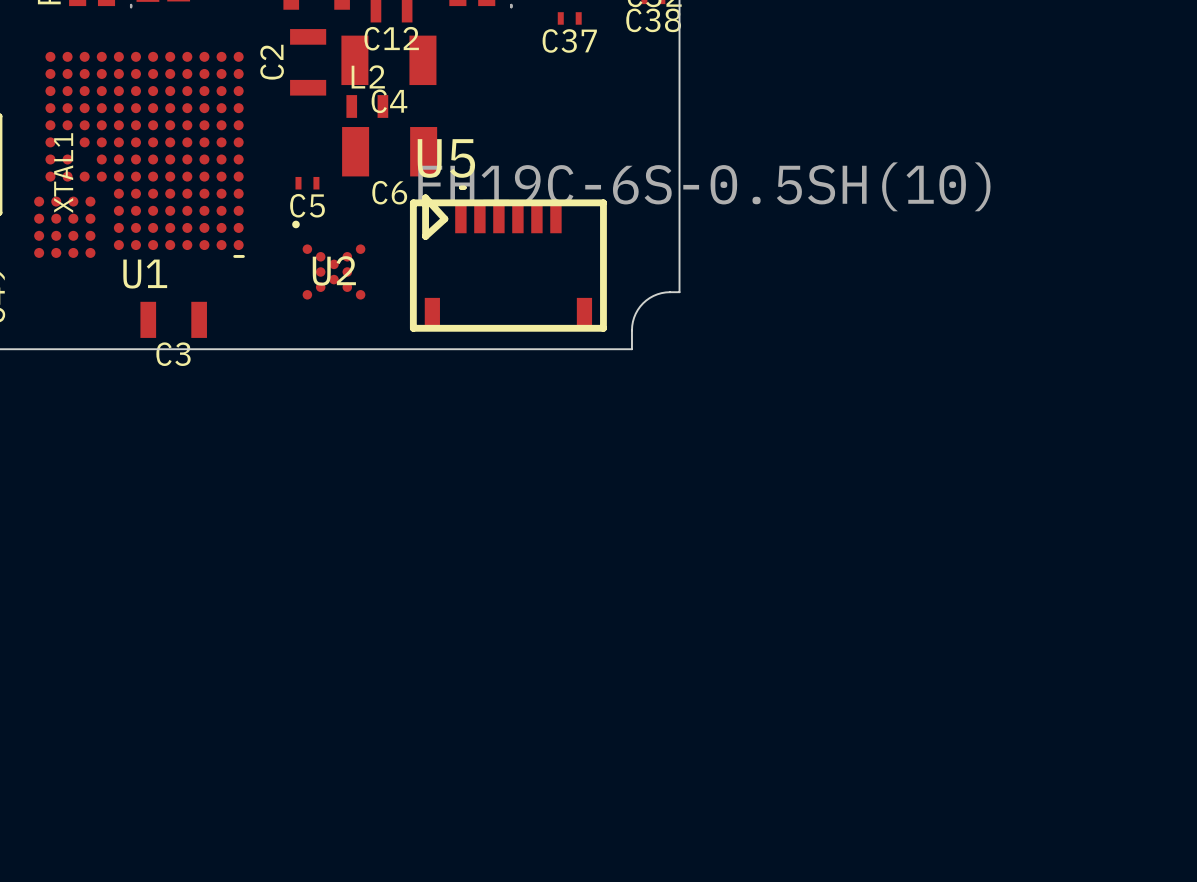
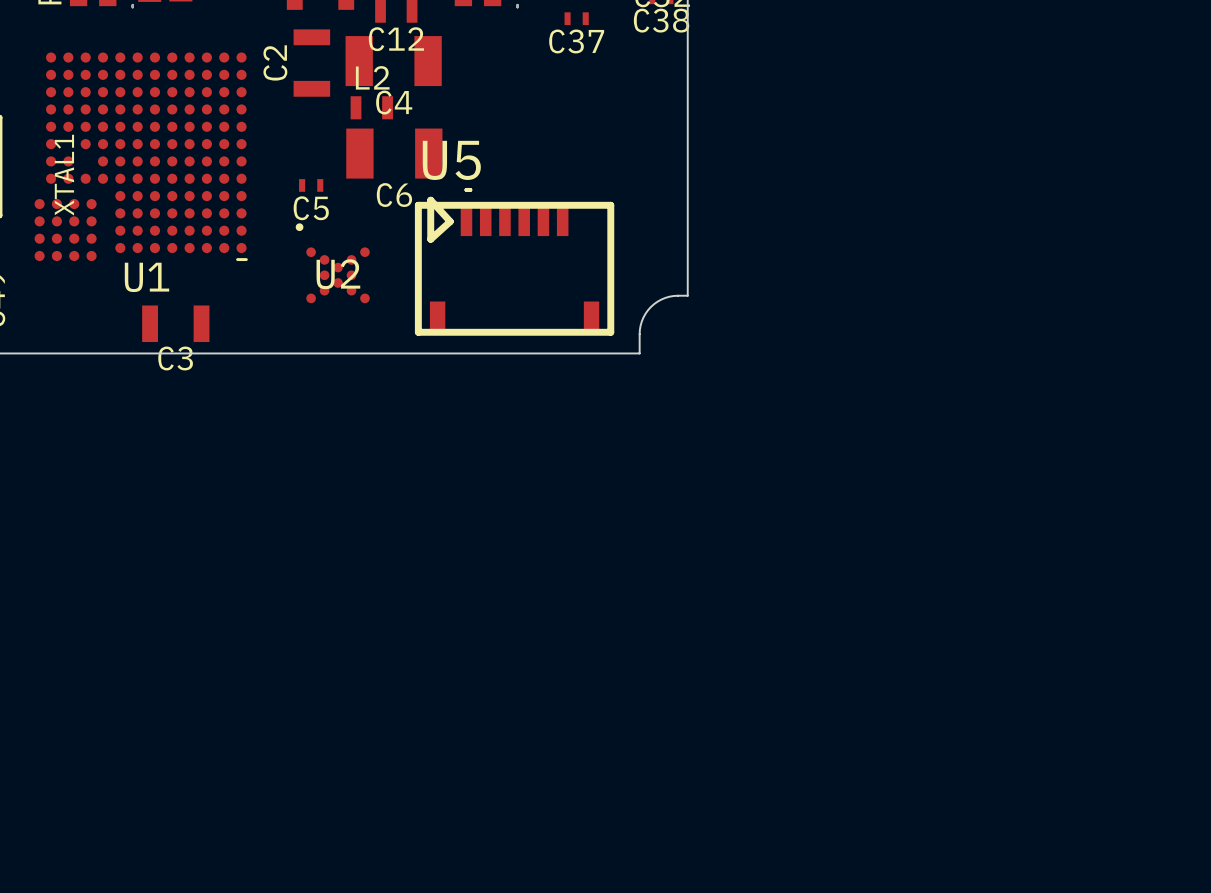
U5 value: FH19C-6S-0.5SH(10) (704, 186) -> none

